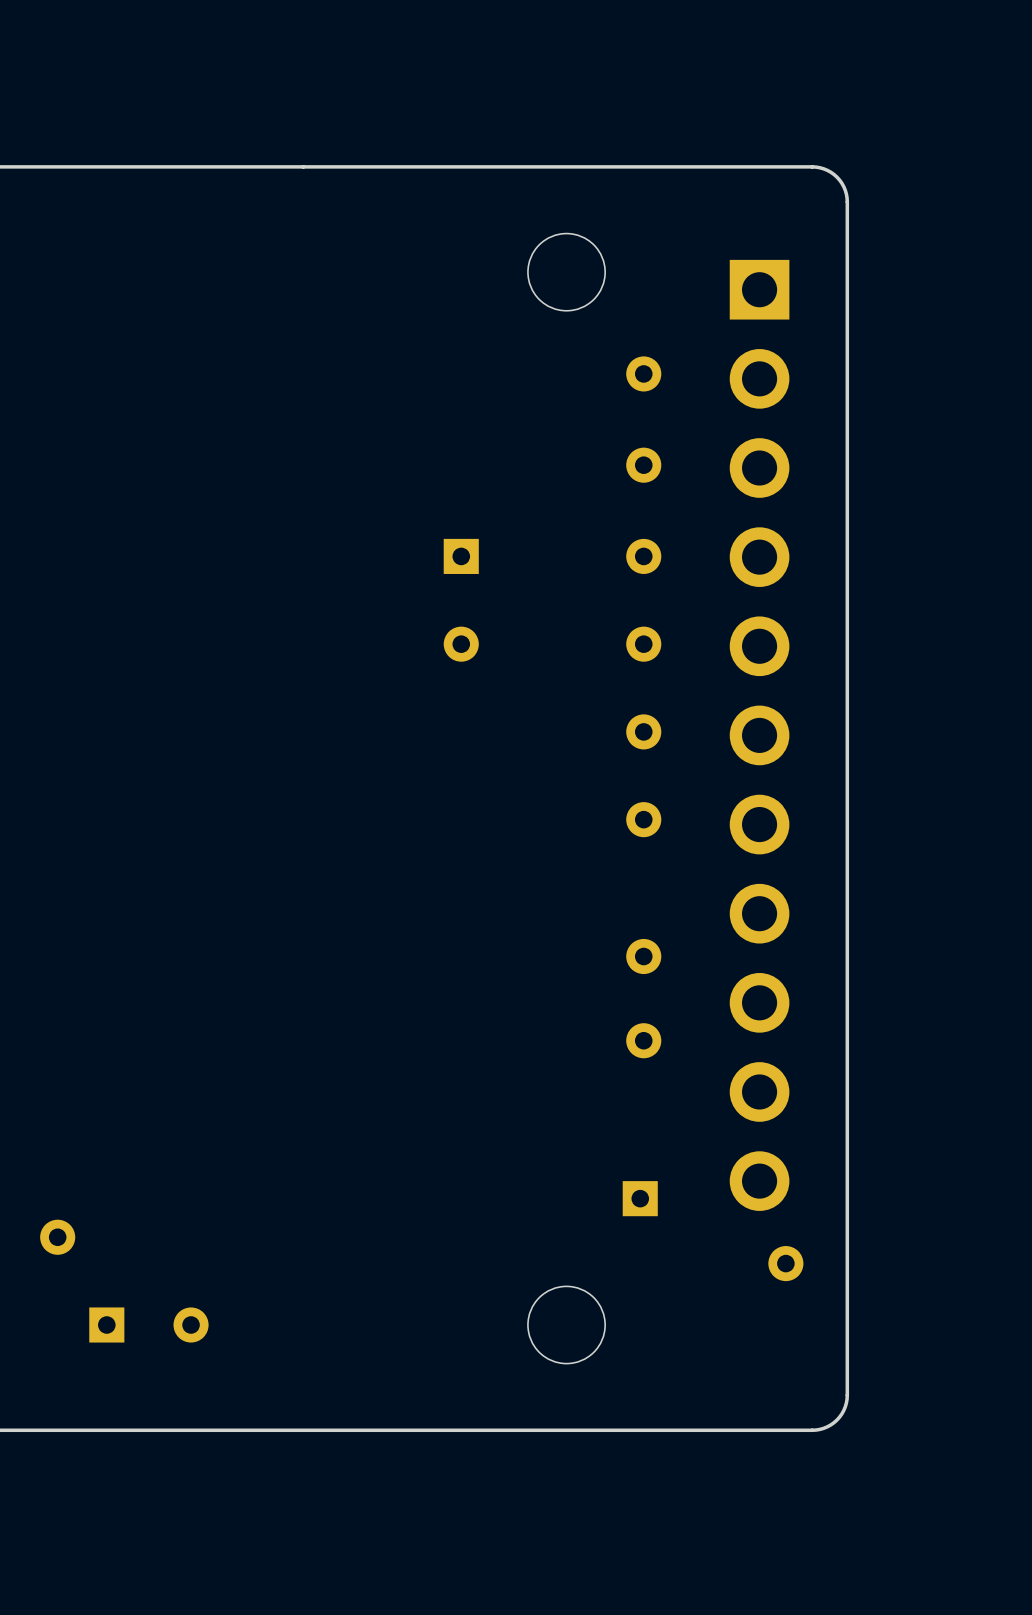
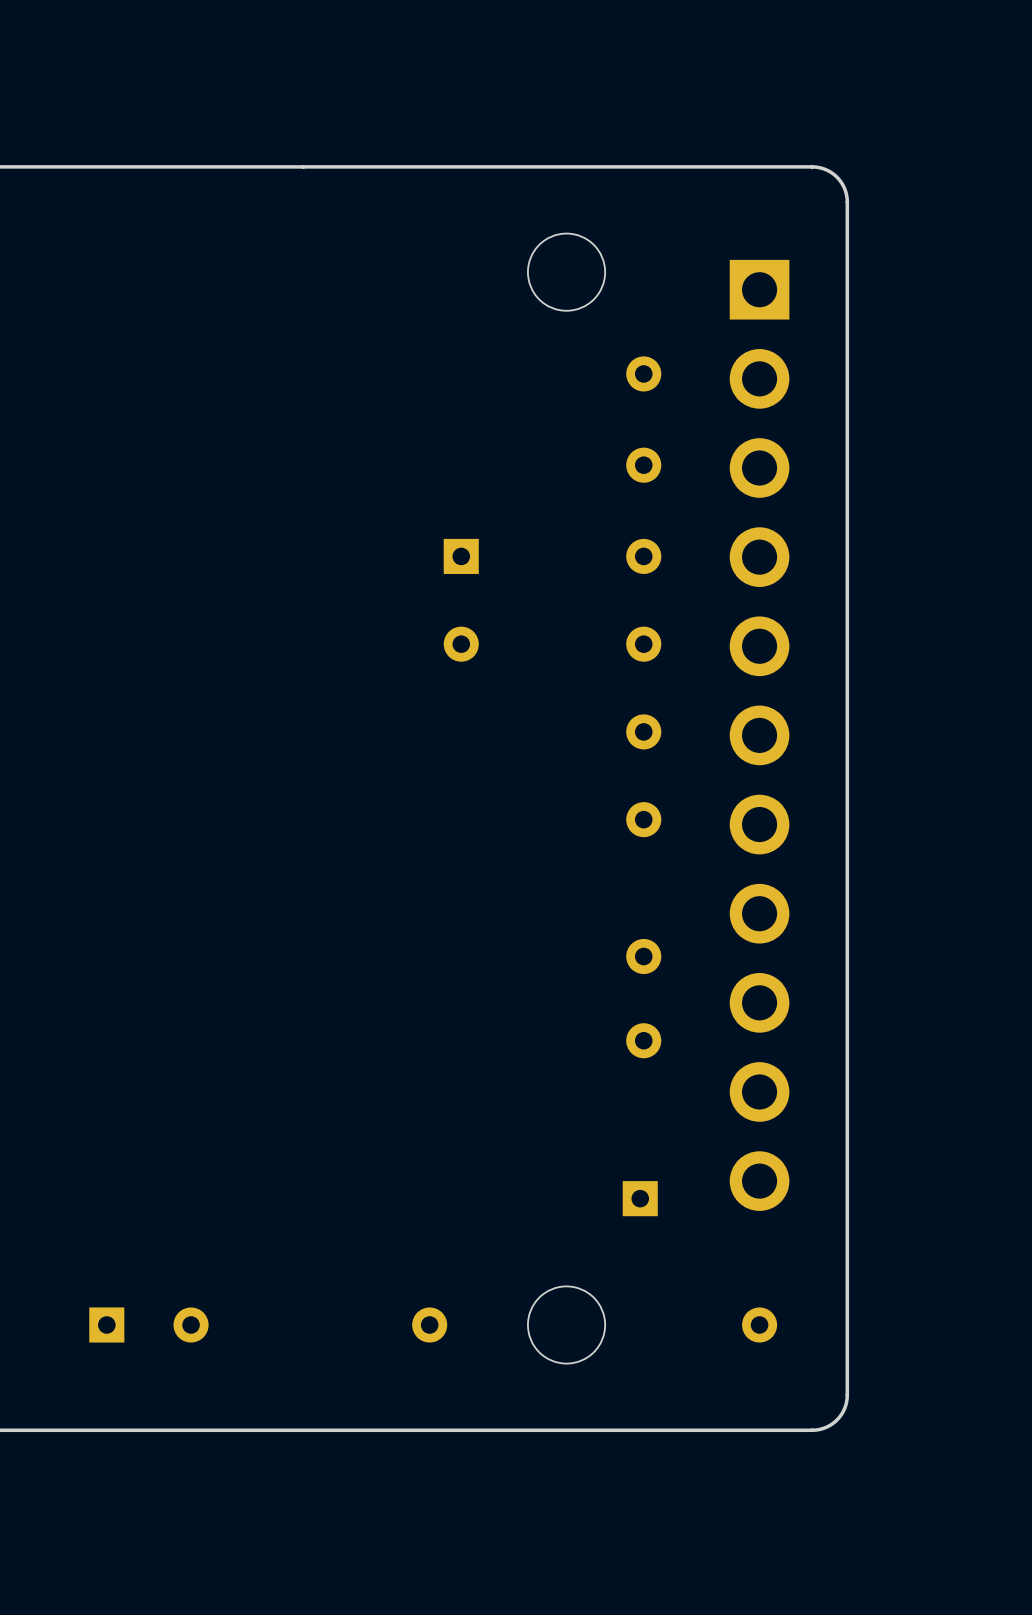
part: (57, 1237) -> none
part position: (785, 1263) -> (759, 1324)
part: none -> (429, 1324)

